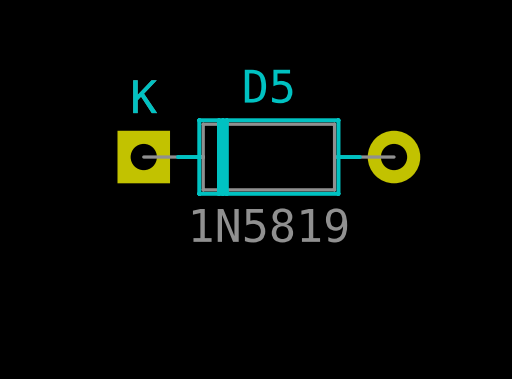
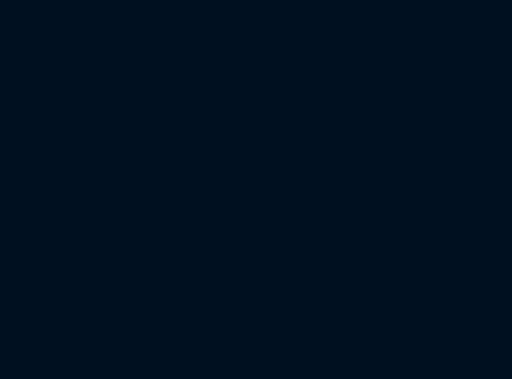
D5: 1N5819 (268, 157) -> none

